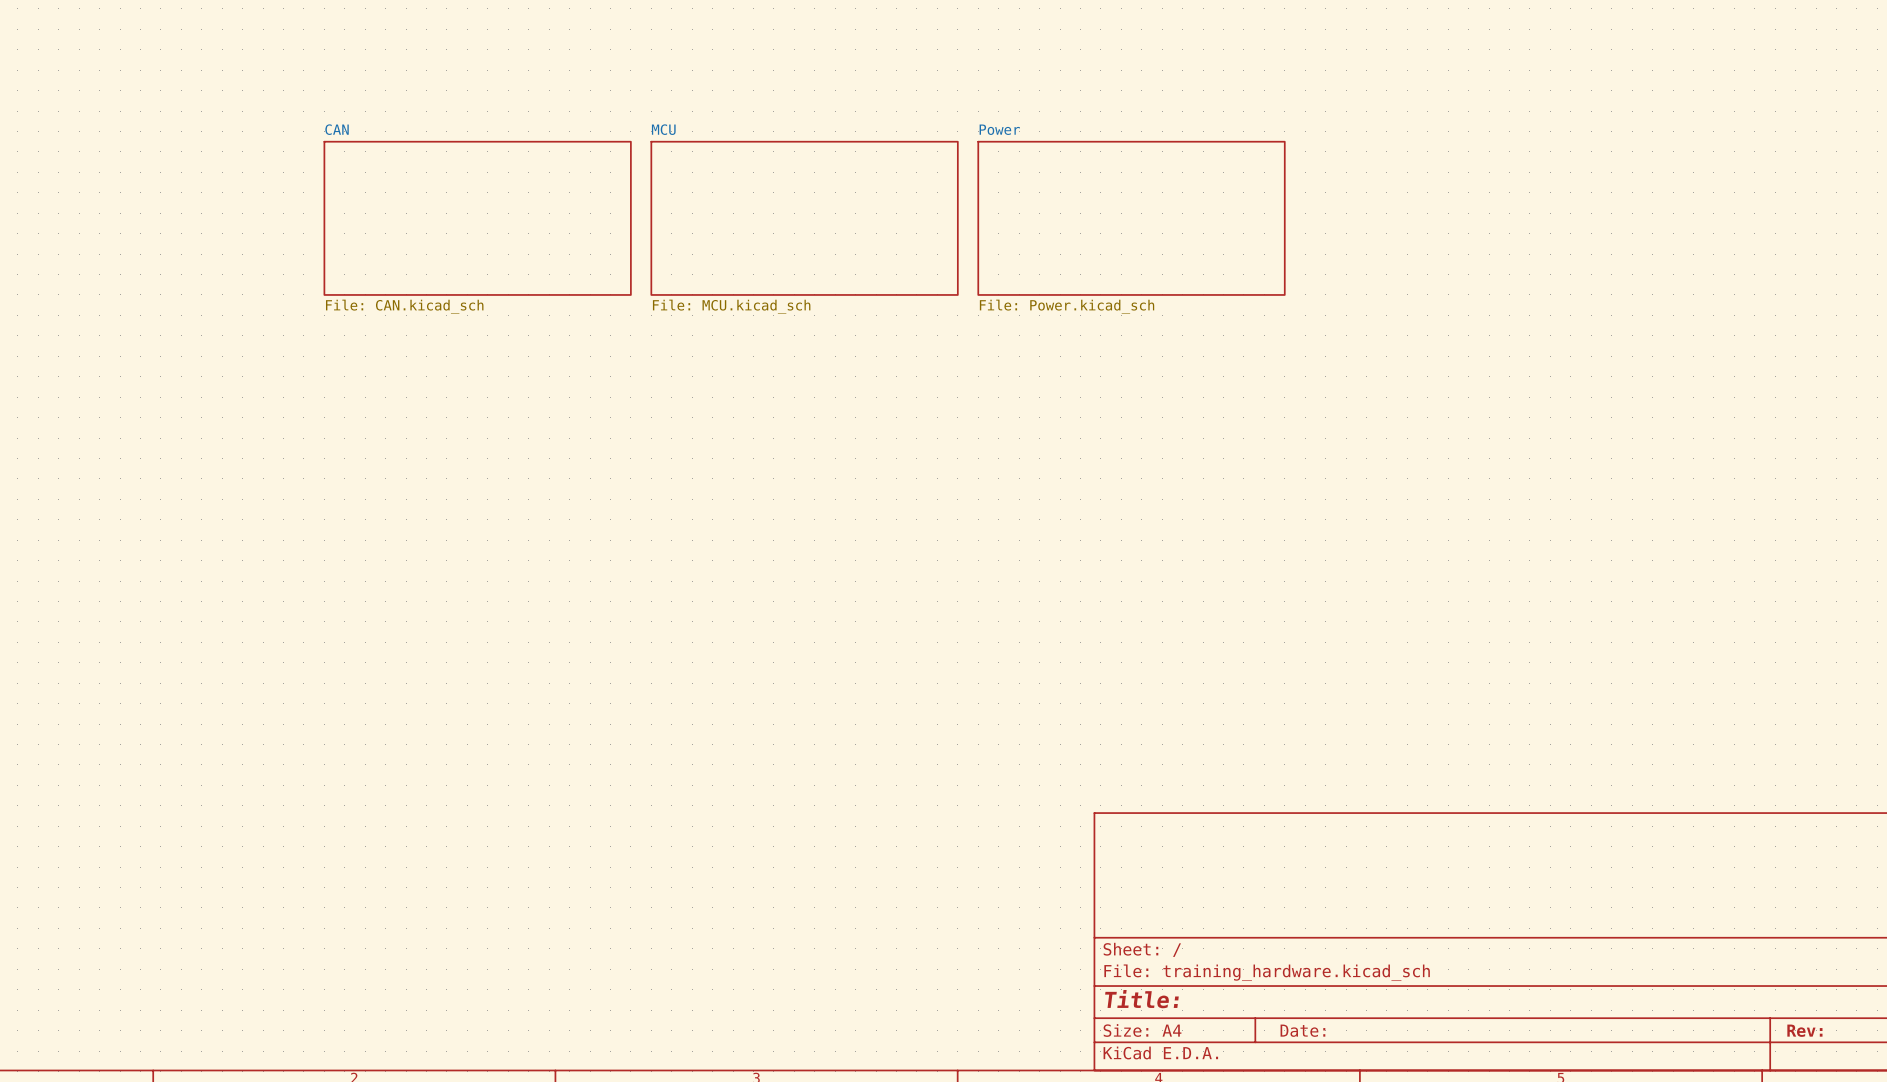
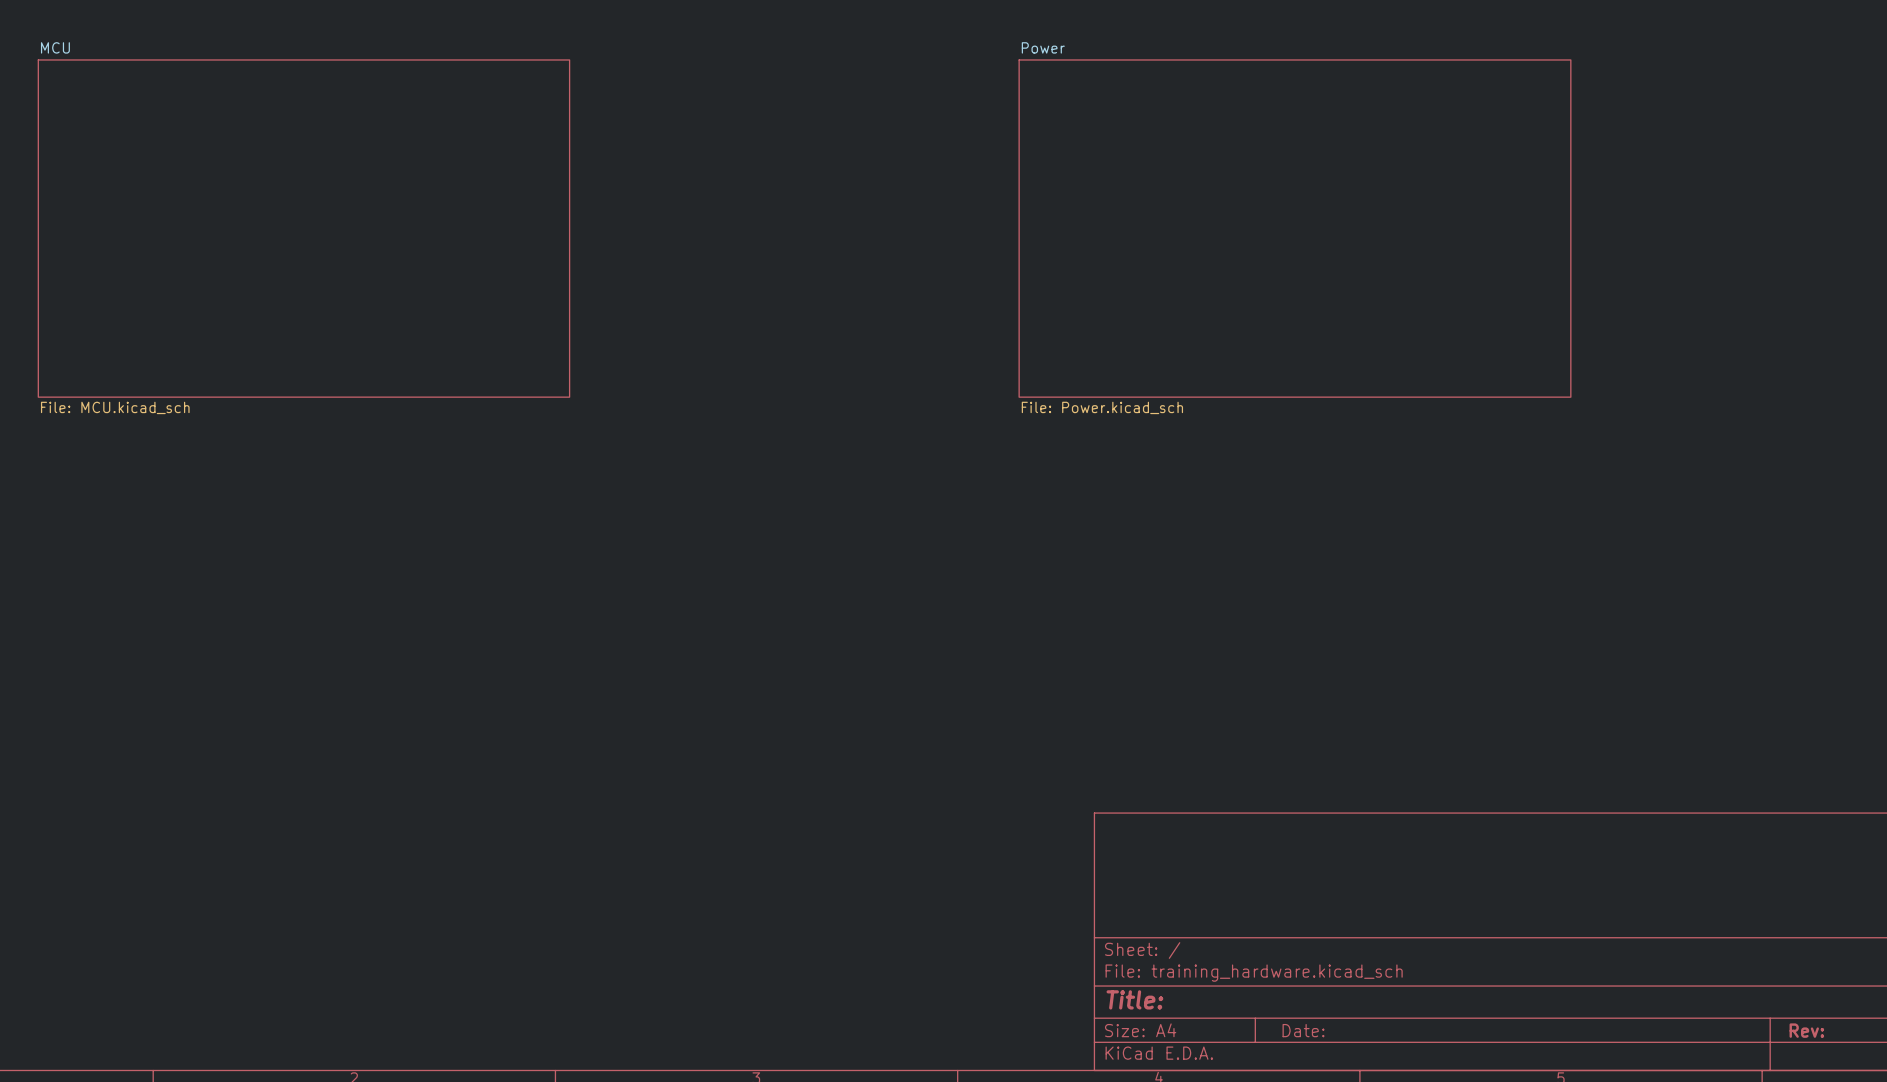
sheet CAN: File: CAN.kicad_sch (477, 218) -> none
sheet MCU: File: MCU.kicad_sch (804, 218) -> none
sheet Power: File: Power.kicad_sch (1131, 218) -> none
sheet MCU: none -> File: MCU.kicad_sch (303, 228)
sheet Power: none -> File: Power.kicad_sch (1294, 228)

